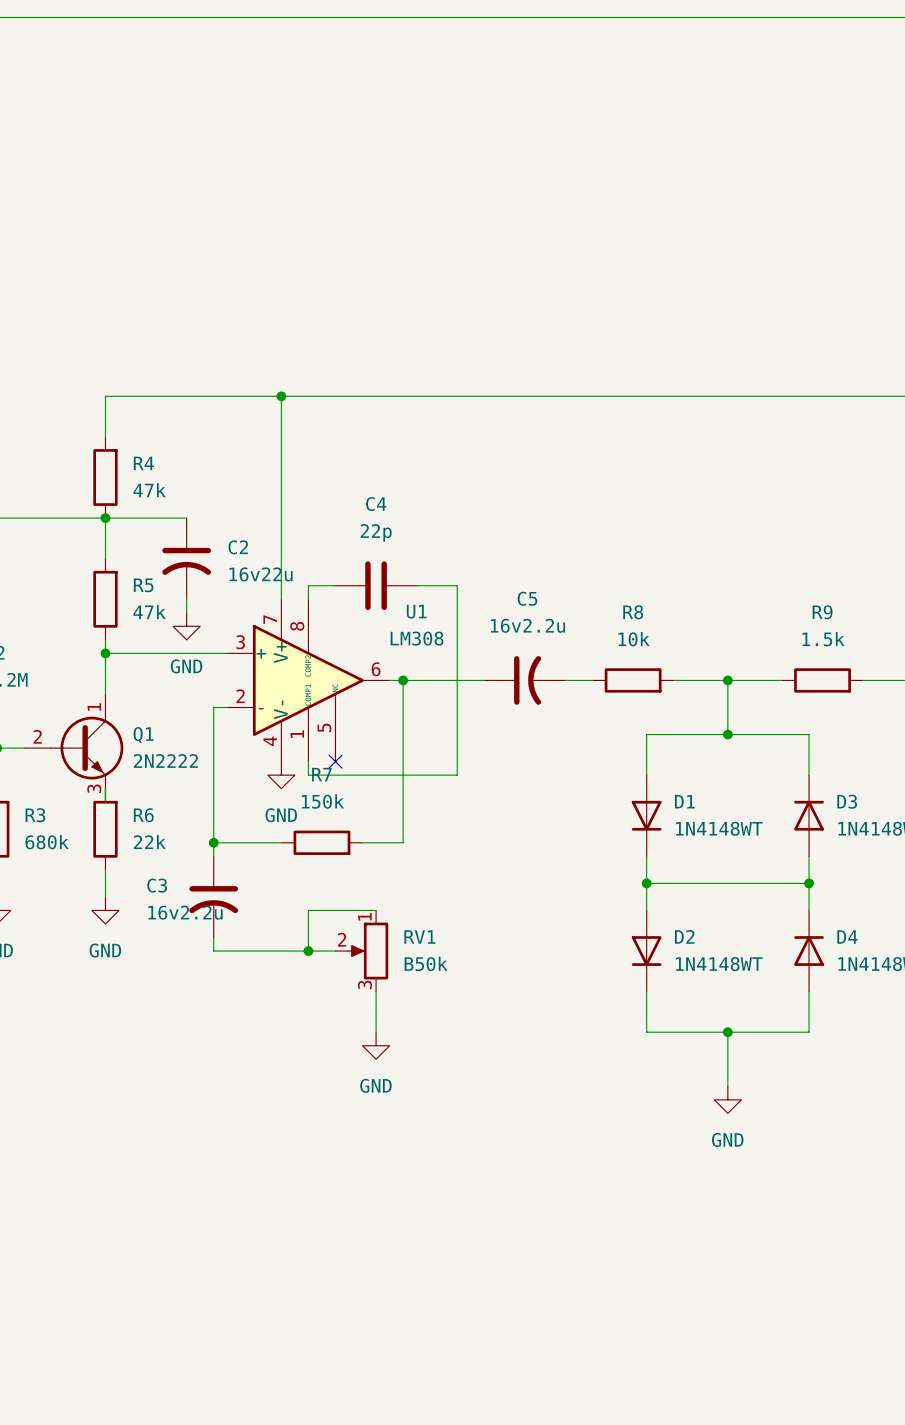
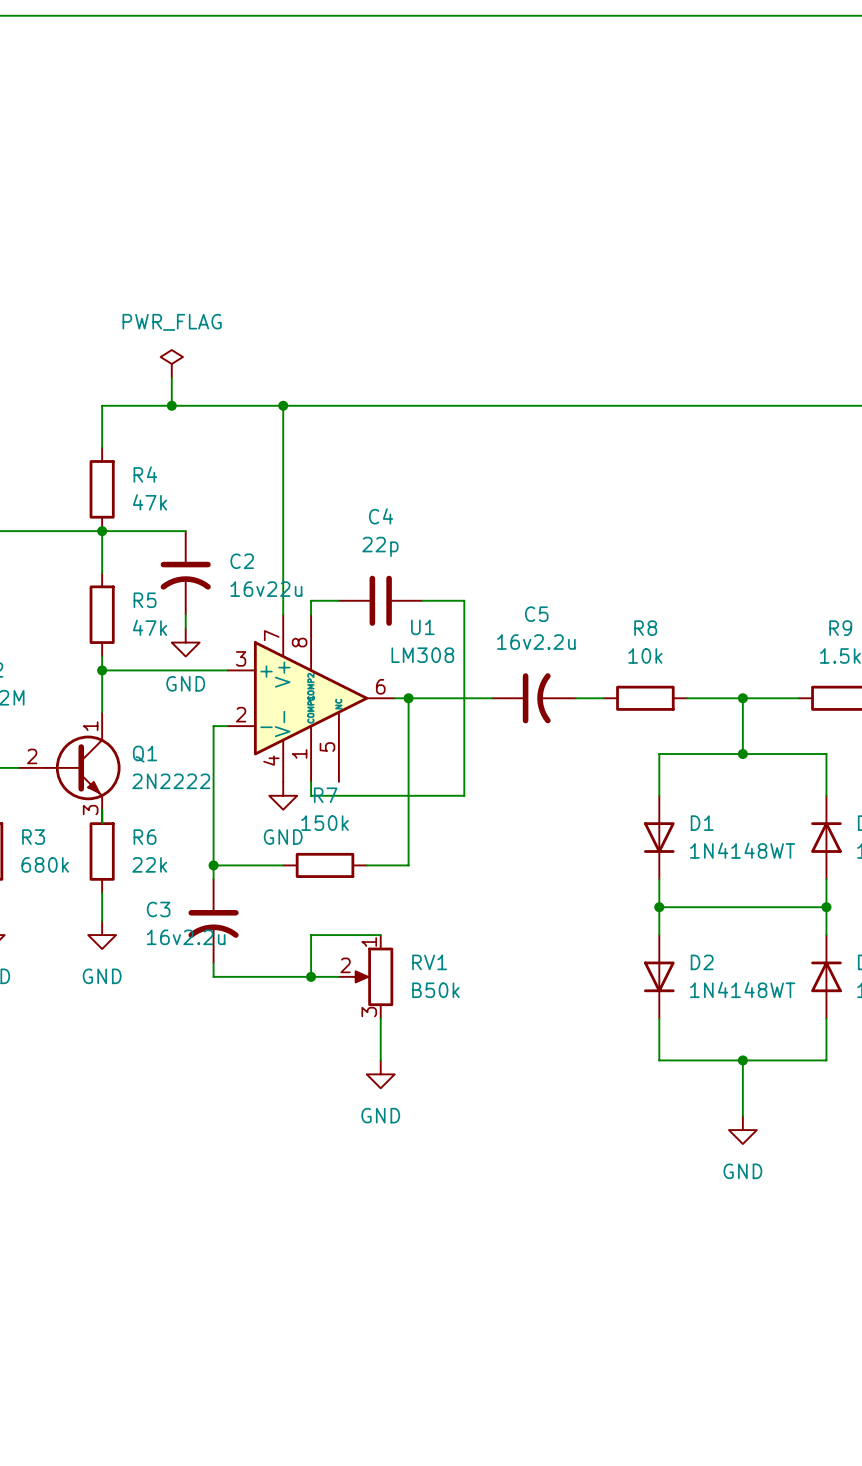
power symbol: none -> PWR_FLAG (171, 363)
wire: none -> (171, 377) (171, 405)
junction: none -> (171, 405)
no-connect mark: (335, 761) -> none

